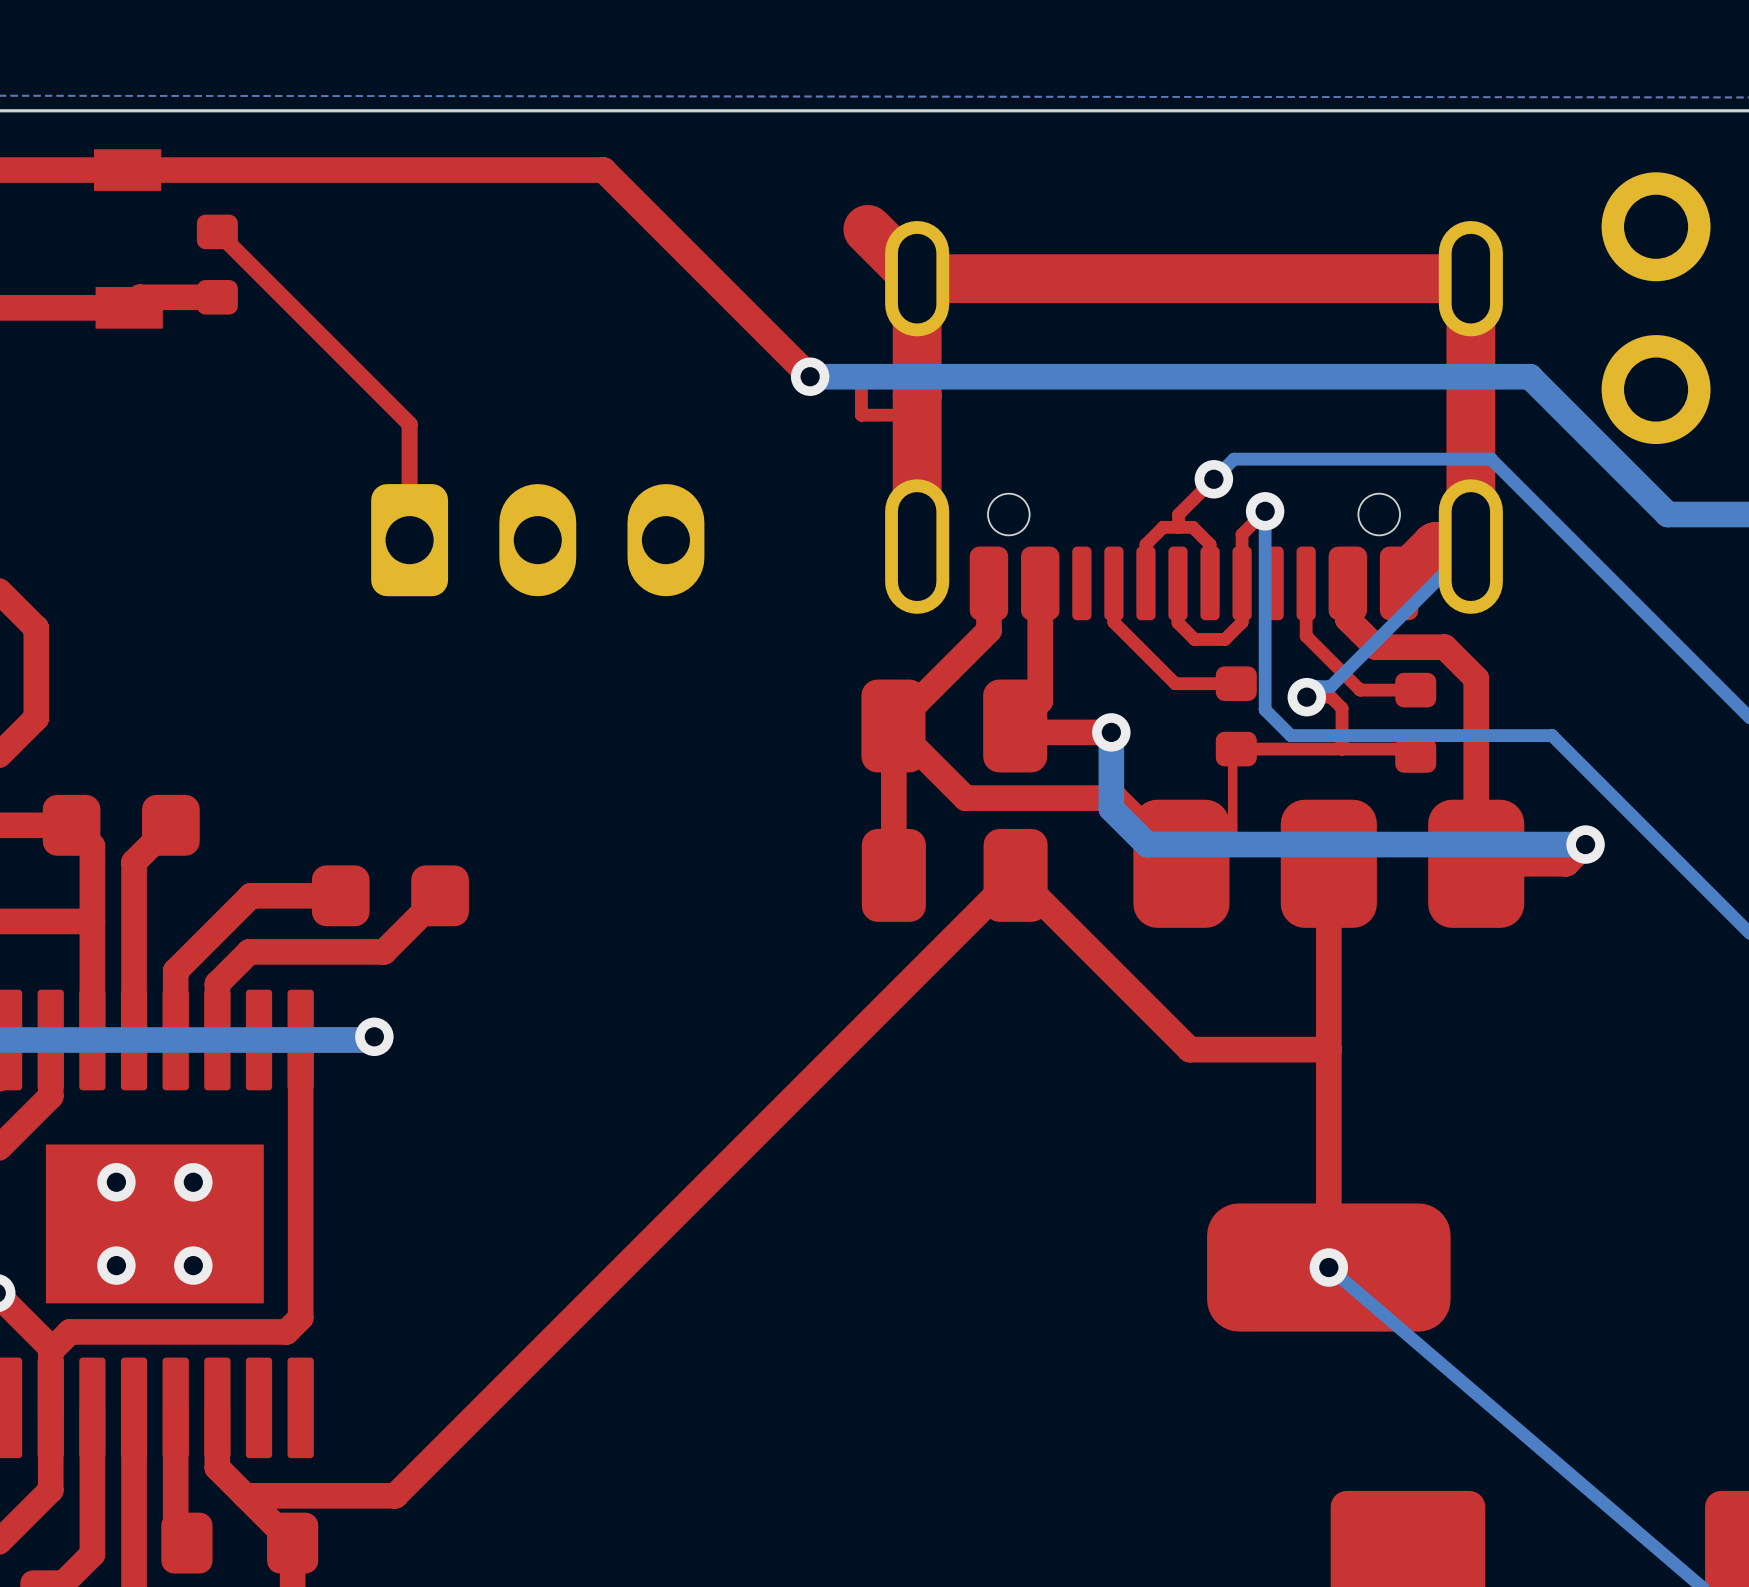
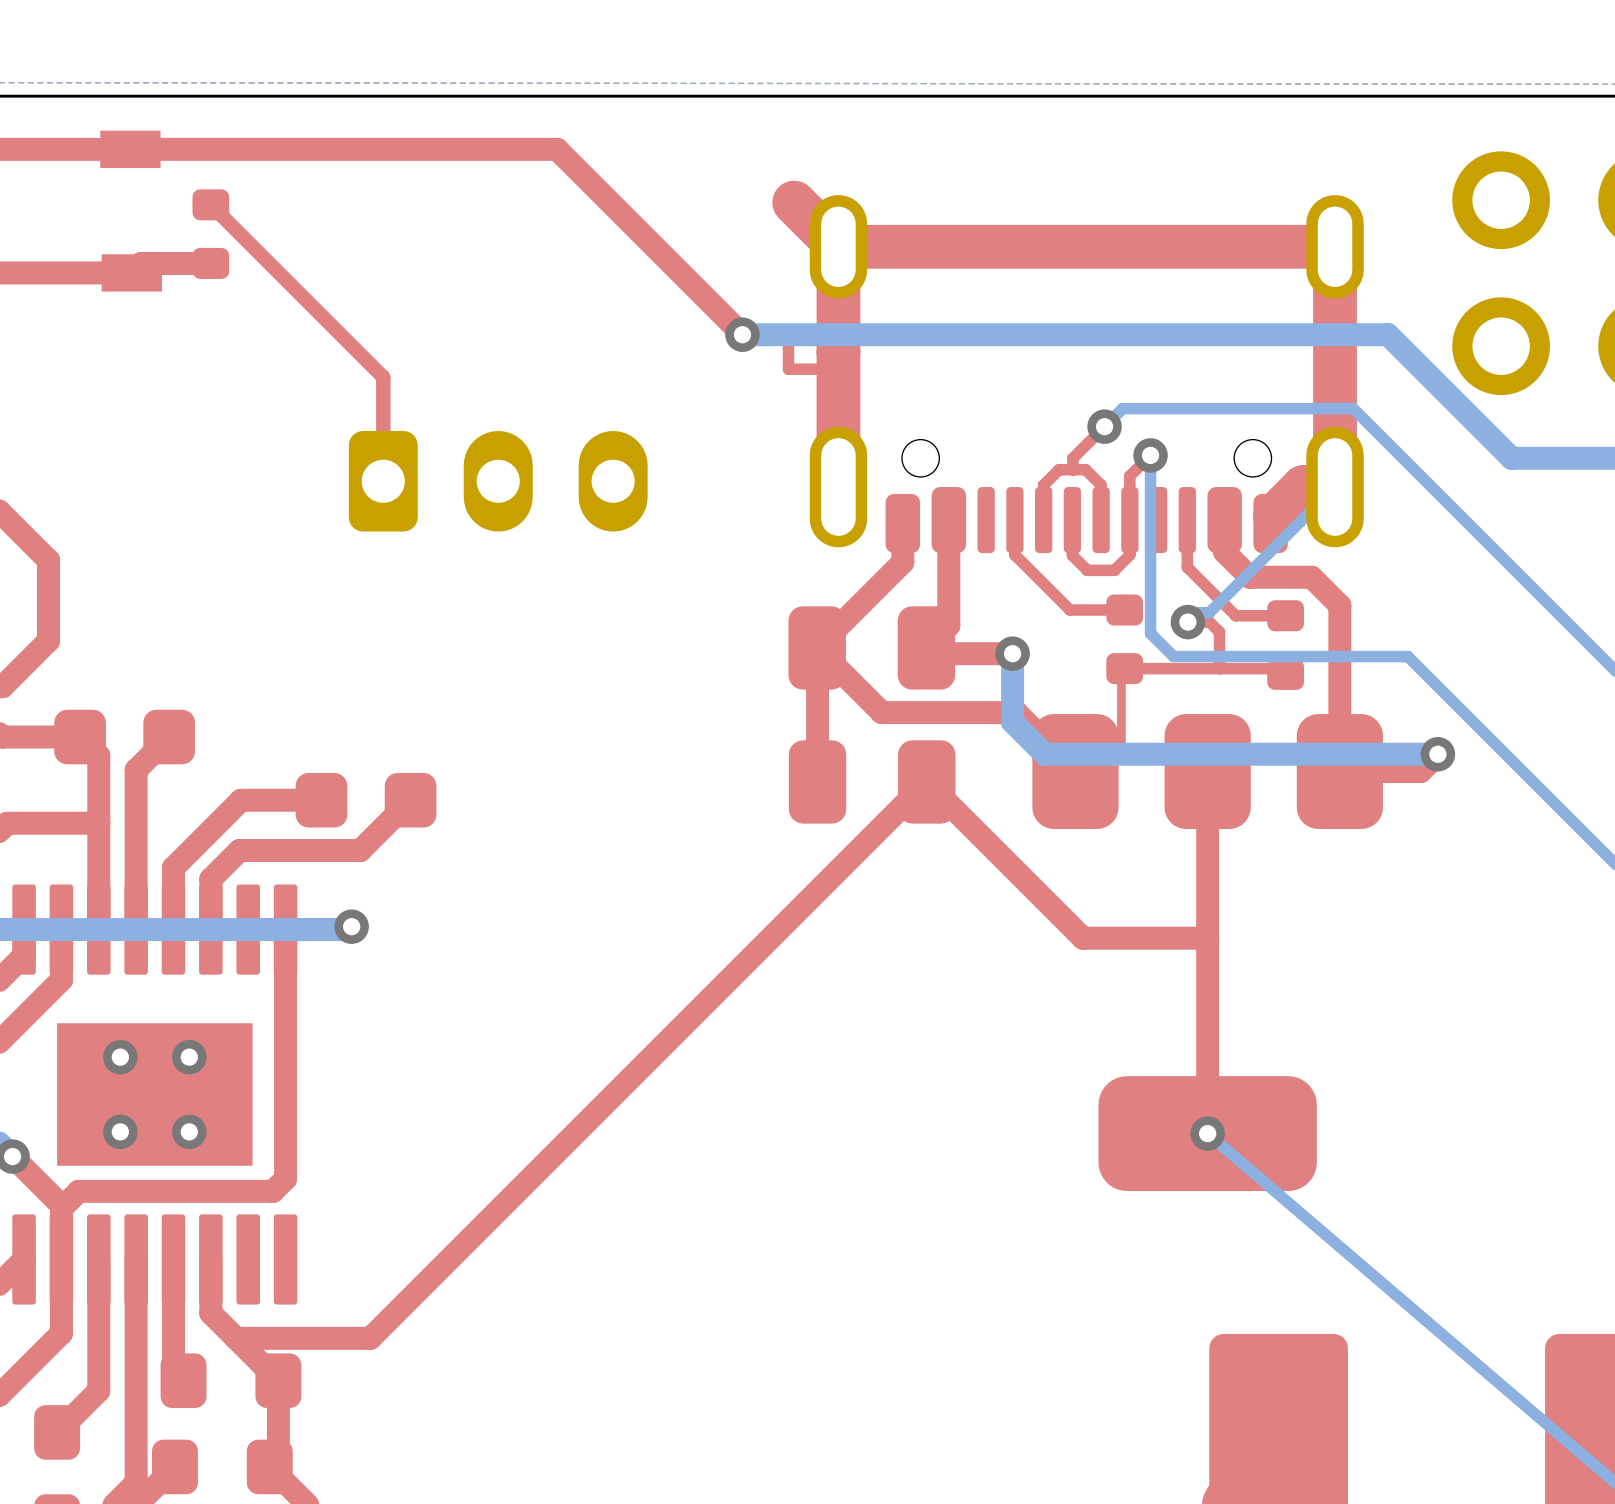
part footprint: [885, 221, 1503, 621] -> [809, 195, 1364, 554]

